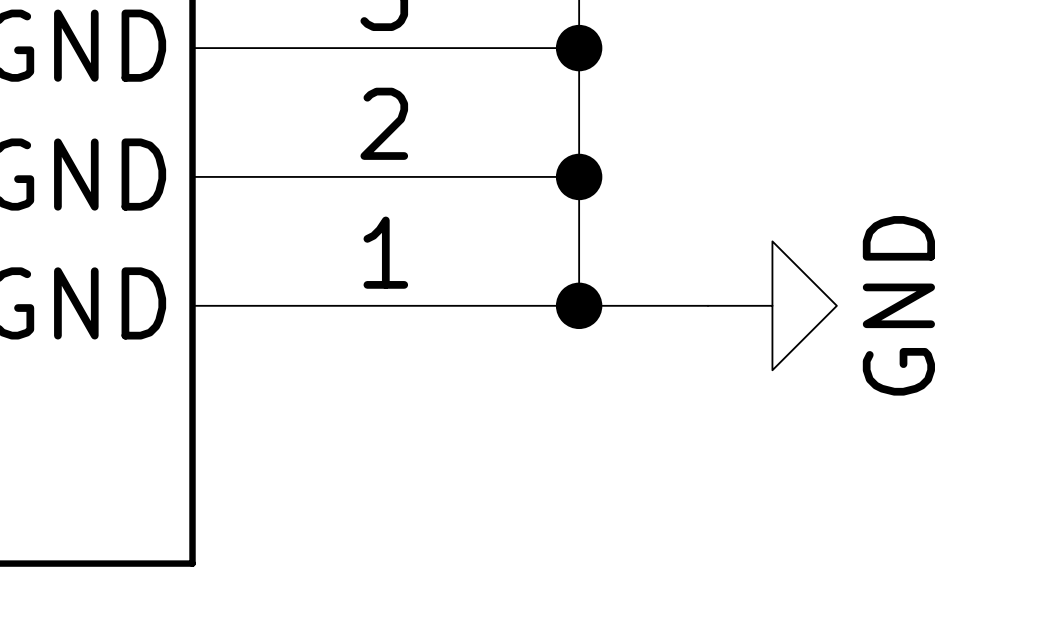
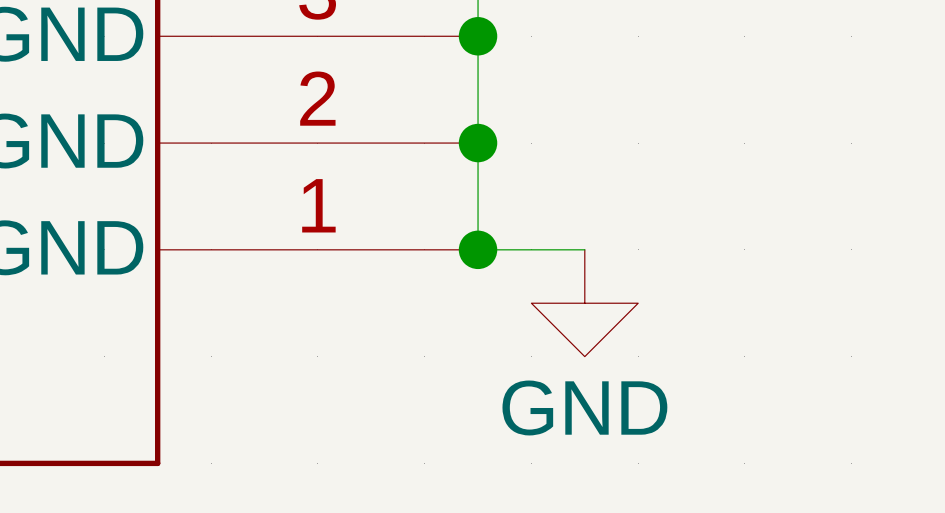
power symbol rotation: 0° (772, 305) -> 90° clockwise (584, 303)
power symbol position: GND (772, 305) -> GND (584, 303)

